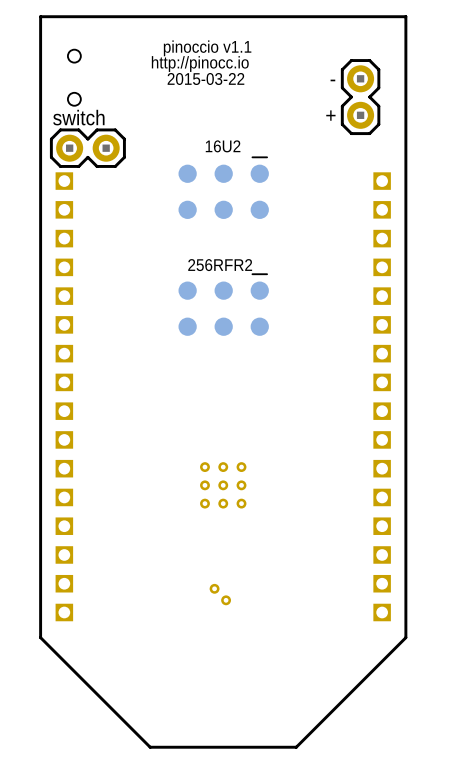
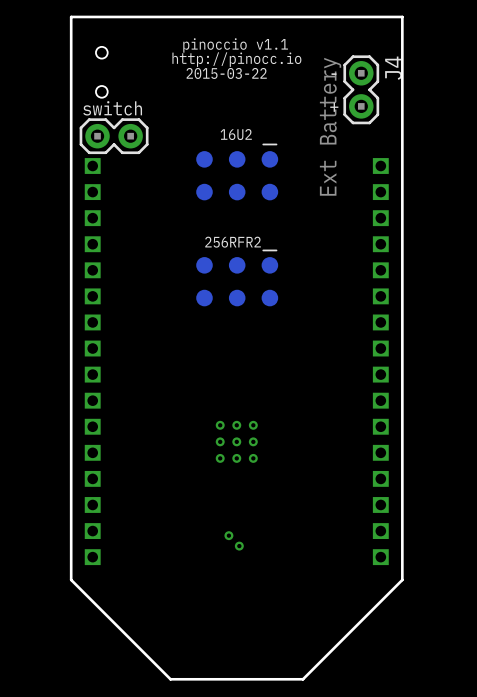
J4 name: none -> J4 (393, 68)
J4 value: none -> Ext Battery (330, 126)

